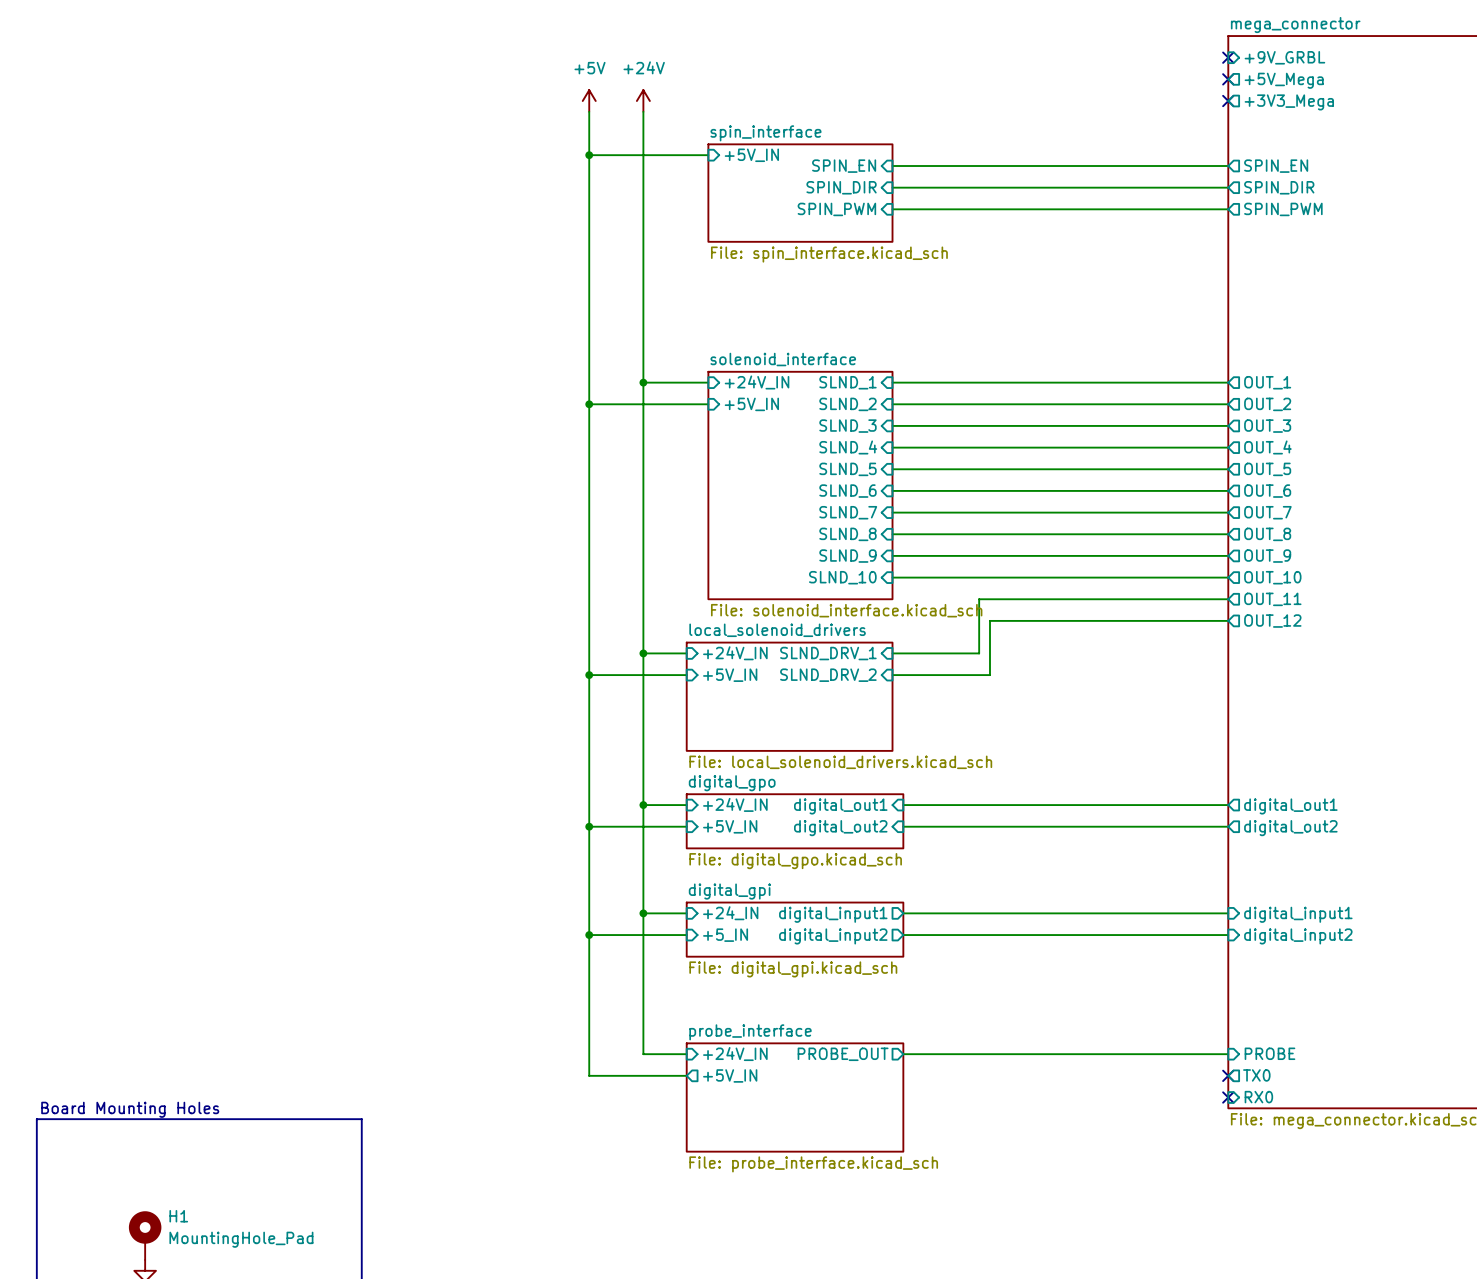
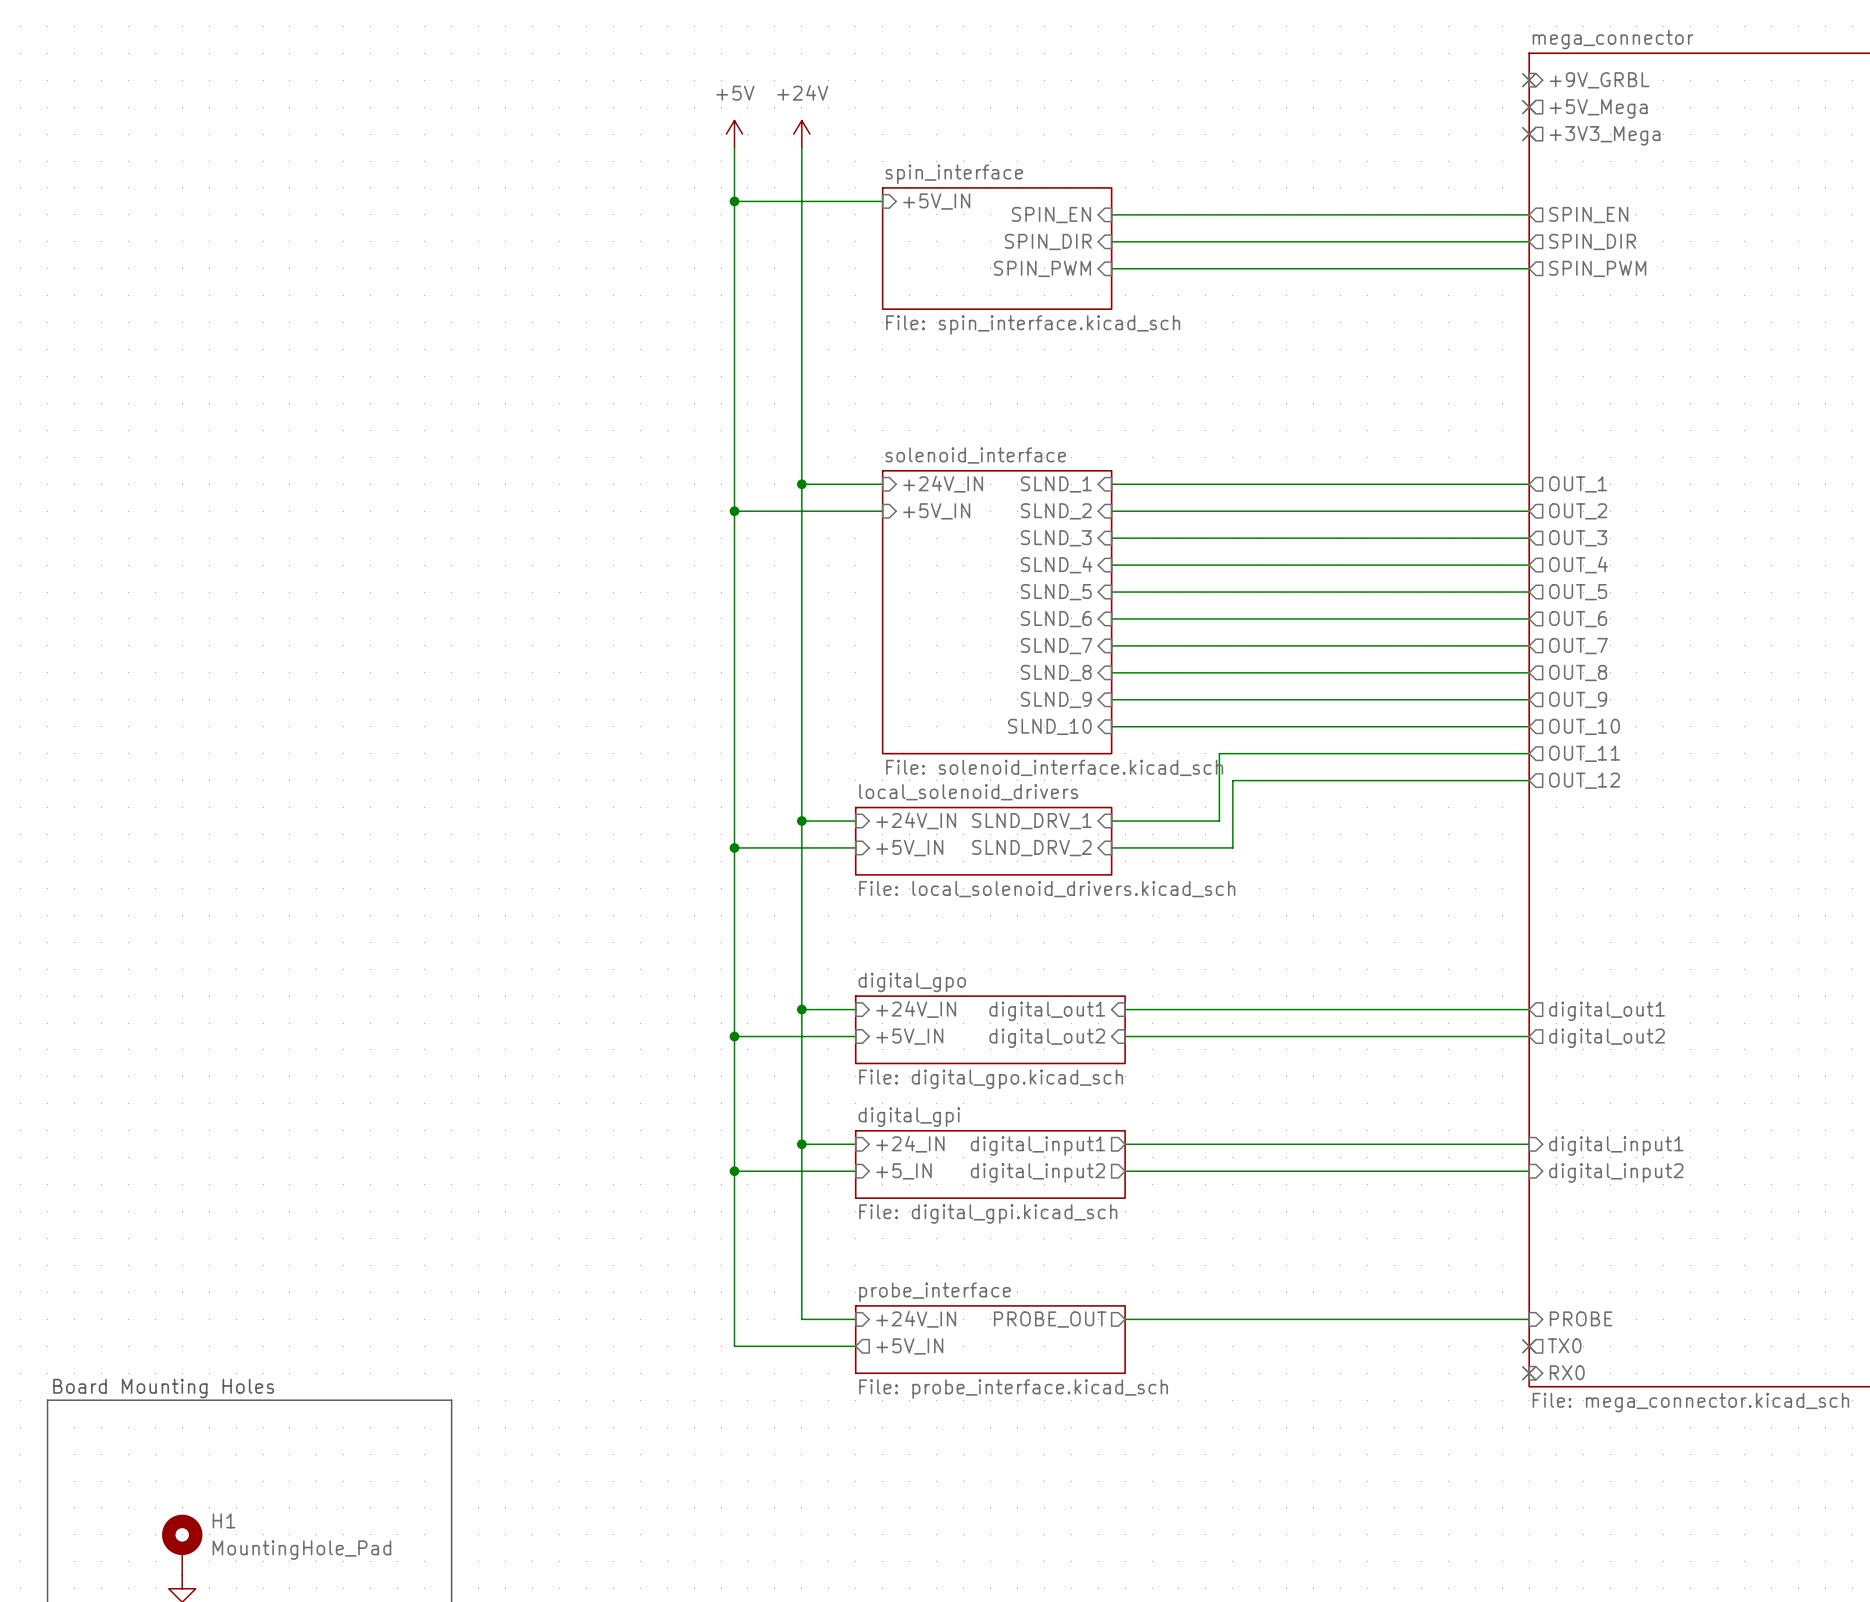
sheet local_solenoid_drivers: none -> File: local_solenoid_drivers.kicad_sch (983, 841)
sheet local_solenoid_drivers: File: local_solenoid_drivers.kicad_sch (789, 696) -> none
sheet probe_interface: none -> File: probe_interface.kicad_sch (990, 1339)
sheet probe_interface: File: probe_interface.kicad_sch (795, 1097) -> none

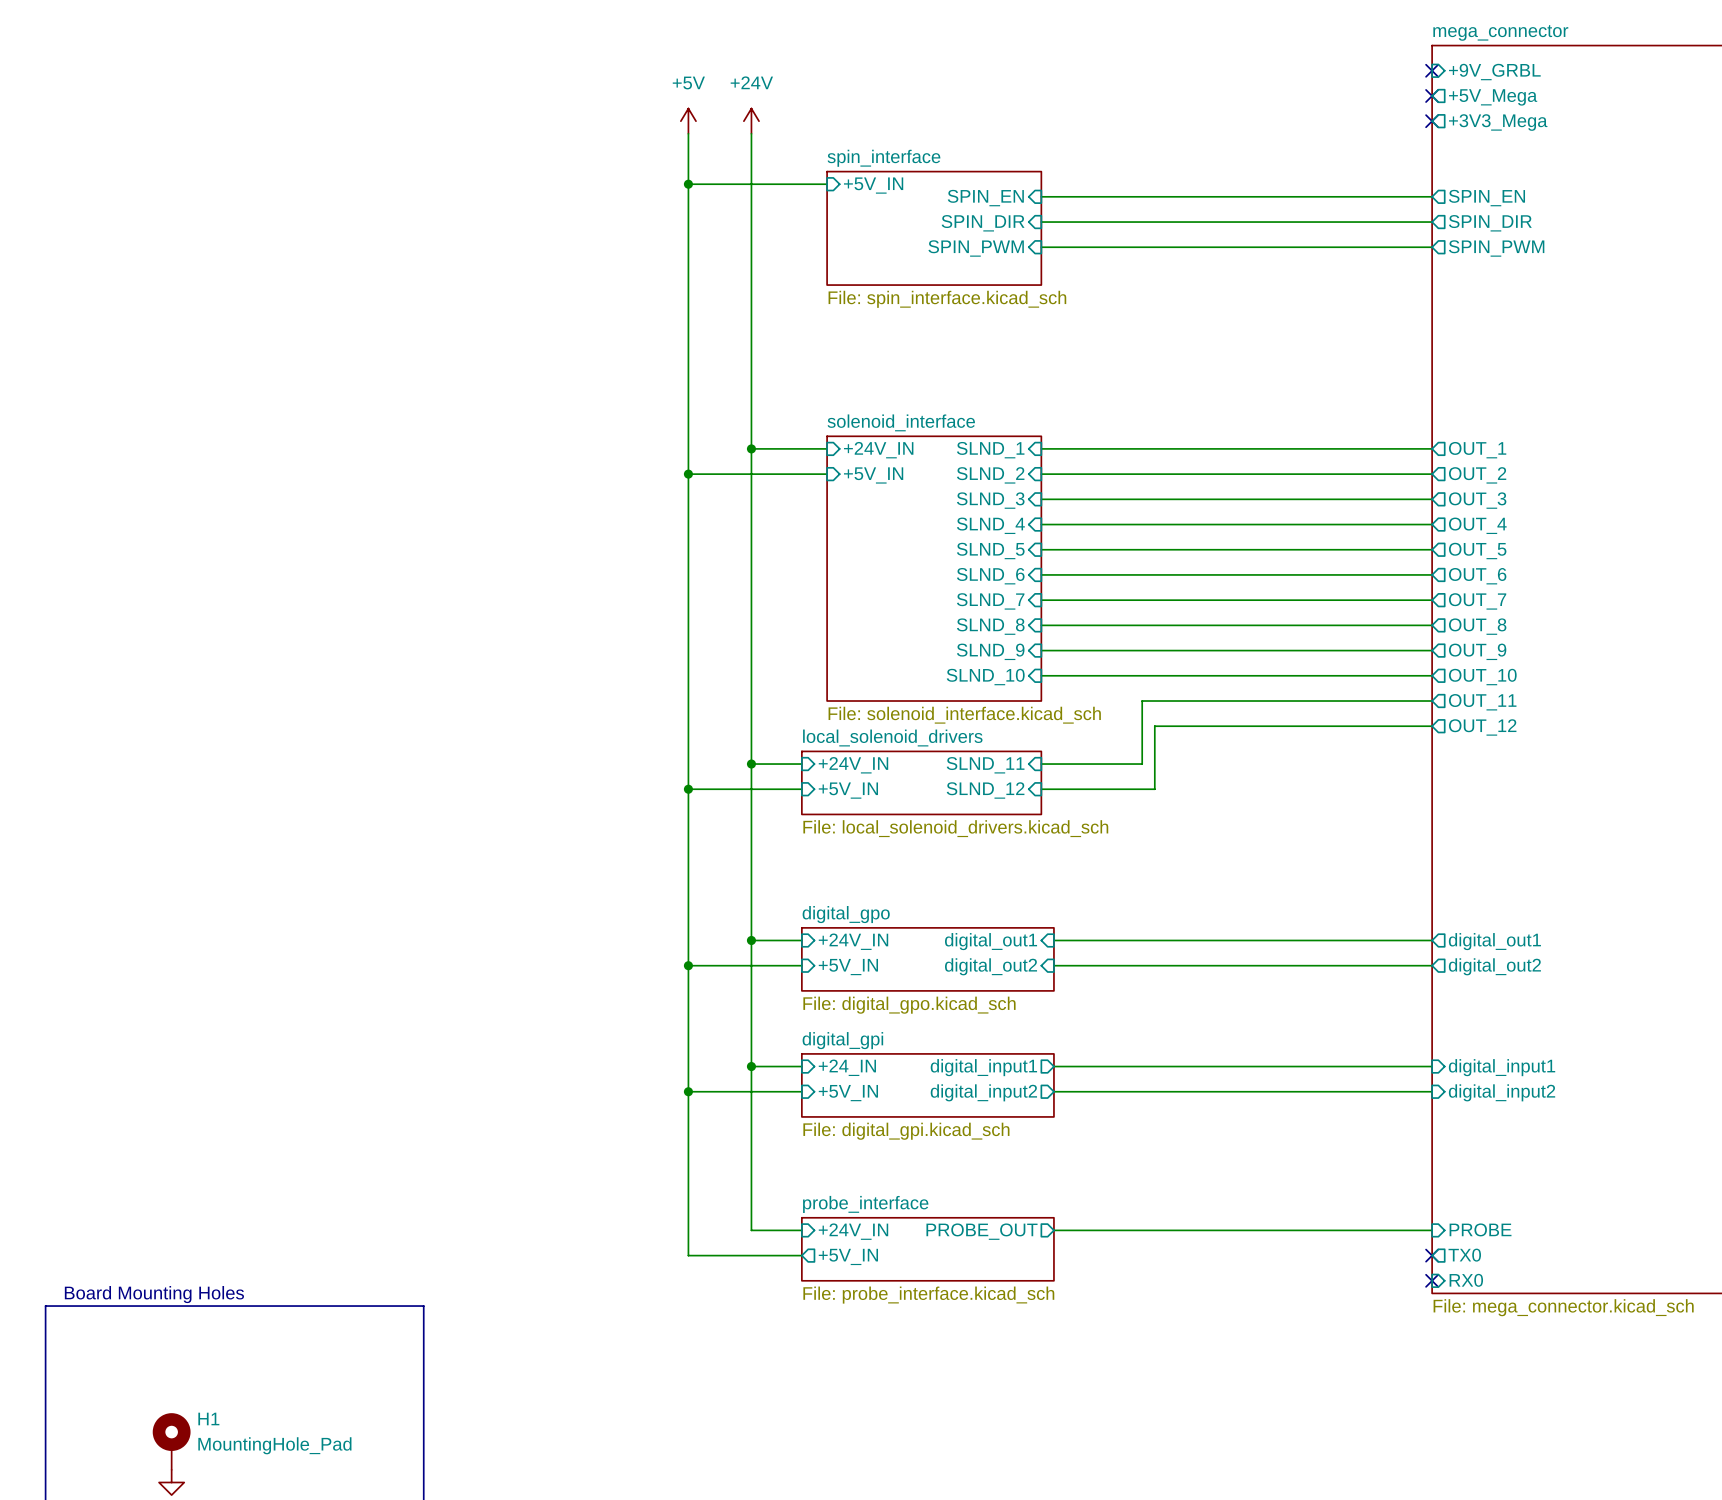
sheet pin: SLND_DRV_1 (1031, 821) -> SLND_11 (985, 765)
sheet pin: SLND_DRV_2 (1031, 848) -> SLND_12 (985, 790)
sheet pin: +5_IN (904, 1171) -> +5V_IN (848, 1093)

